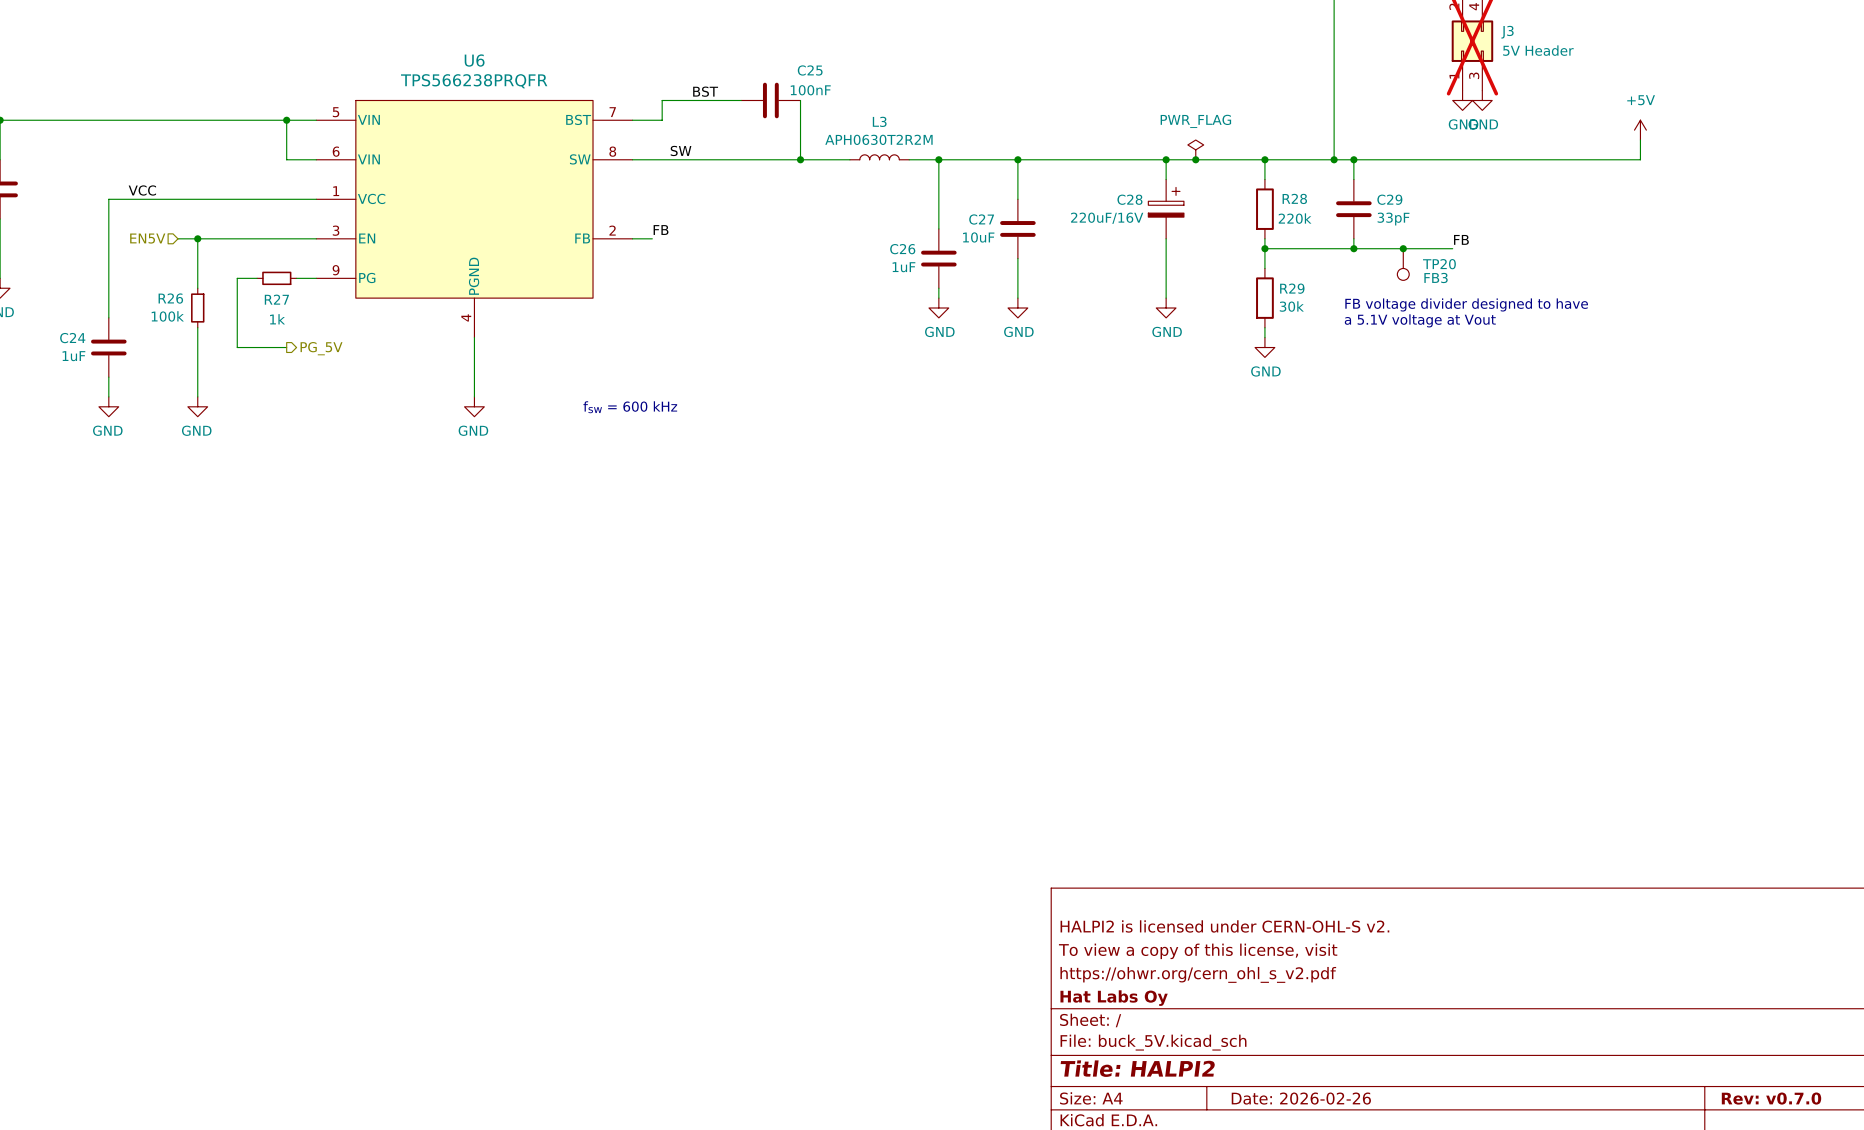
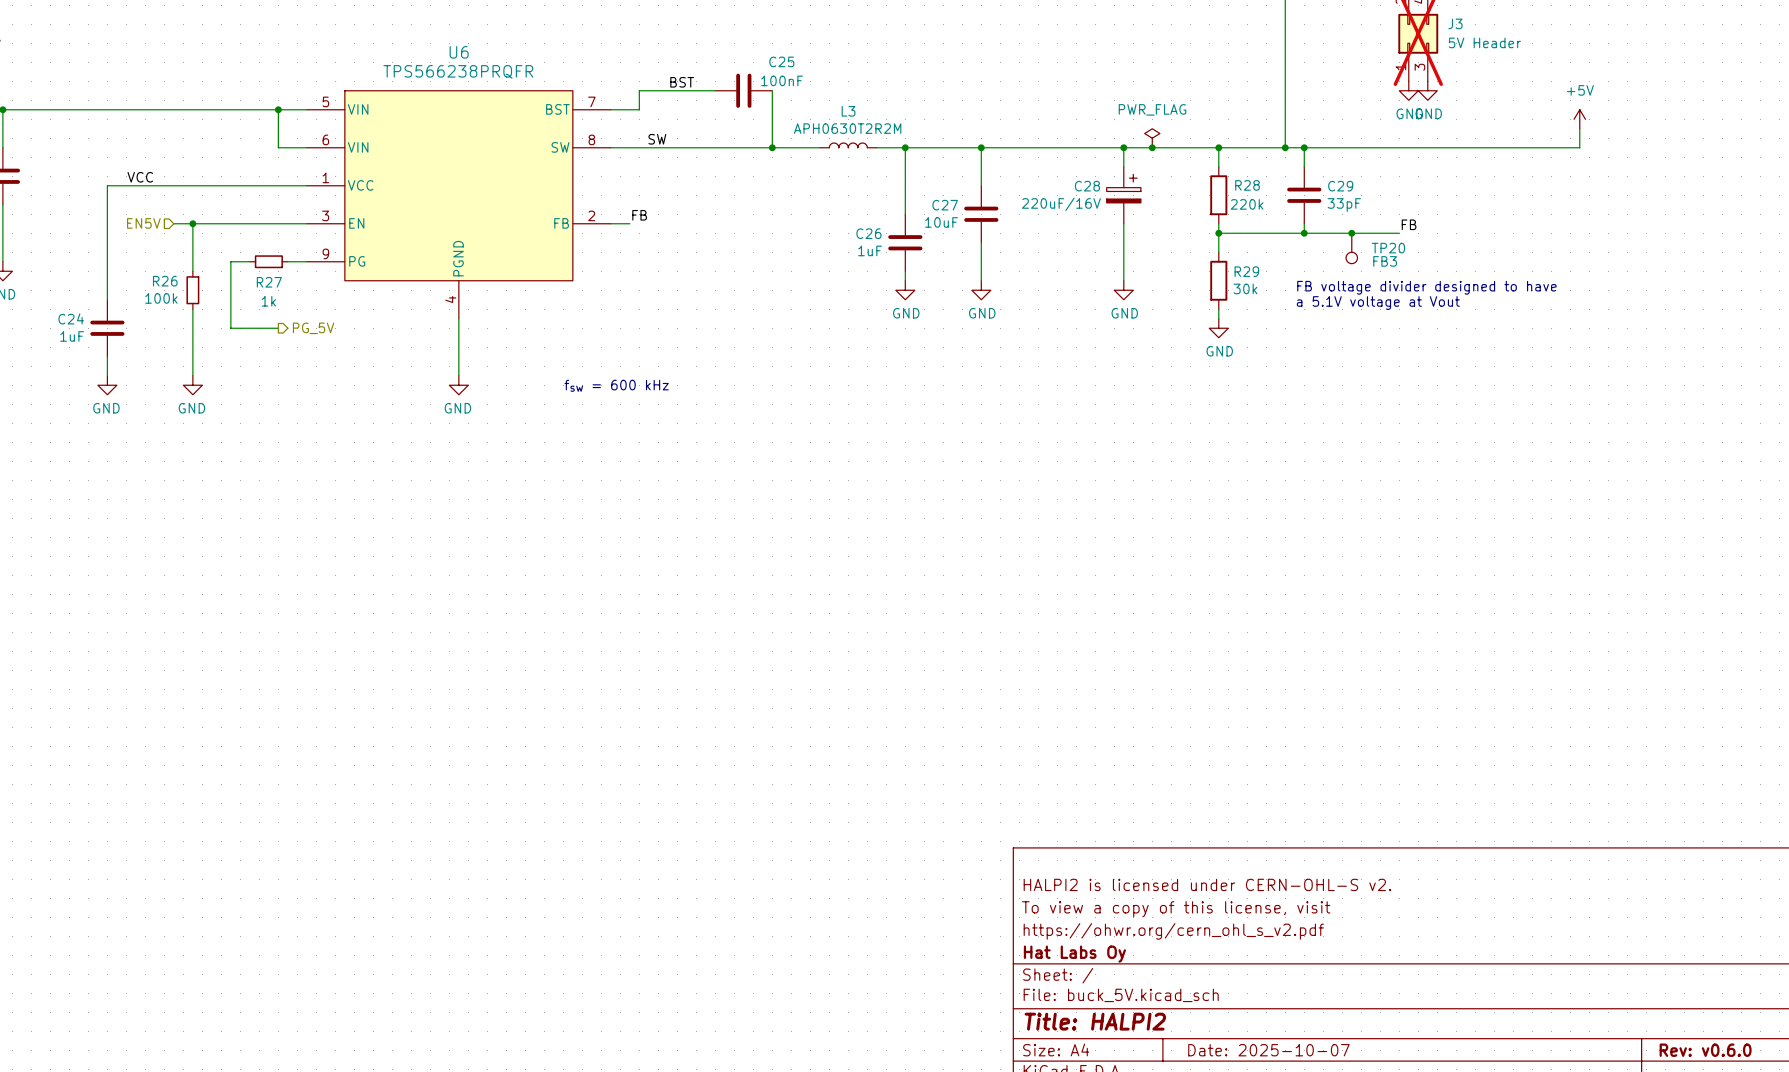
title block: Date: 2026-02-26 (1301, 1098) -> Date: 2025-10-07 (1268, 1050)
title block: Rev: v0.7.0 (1771, 1098) -> Rev: v0.6.0 (1705, 1050)

